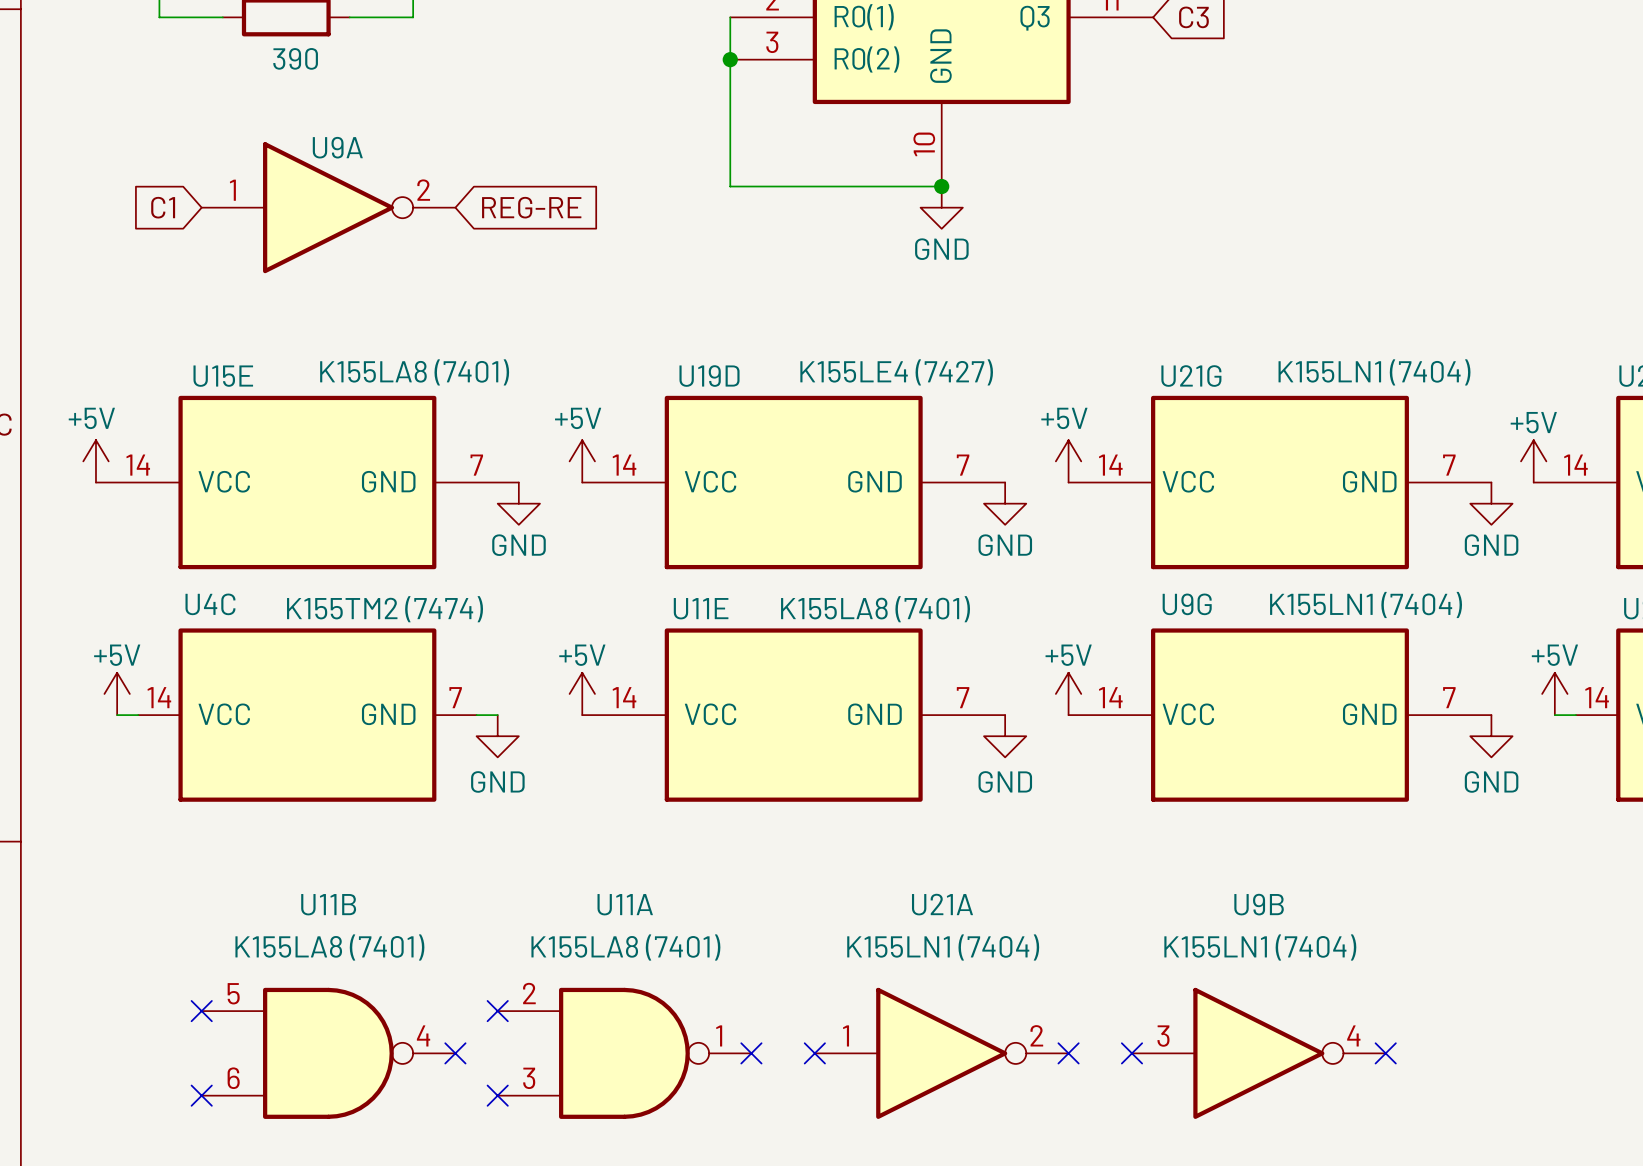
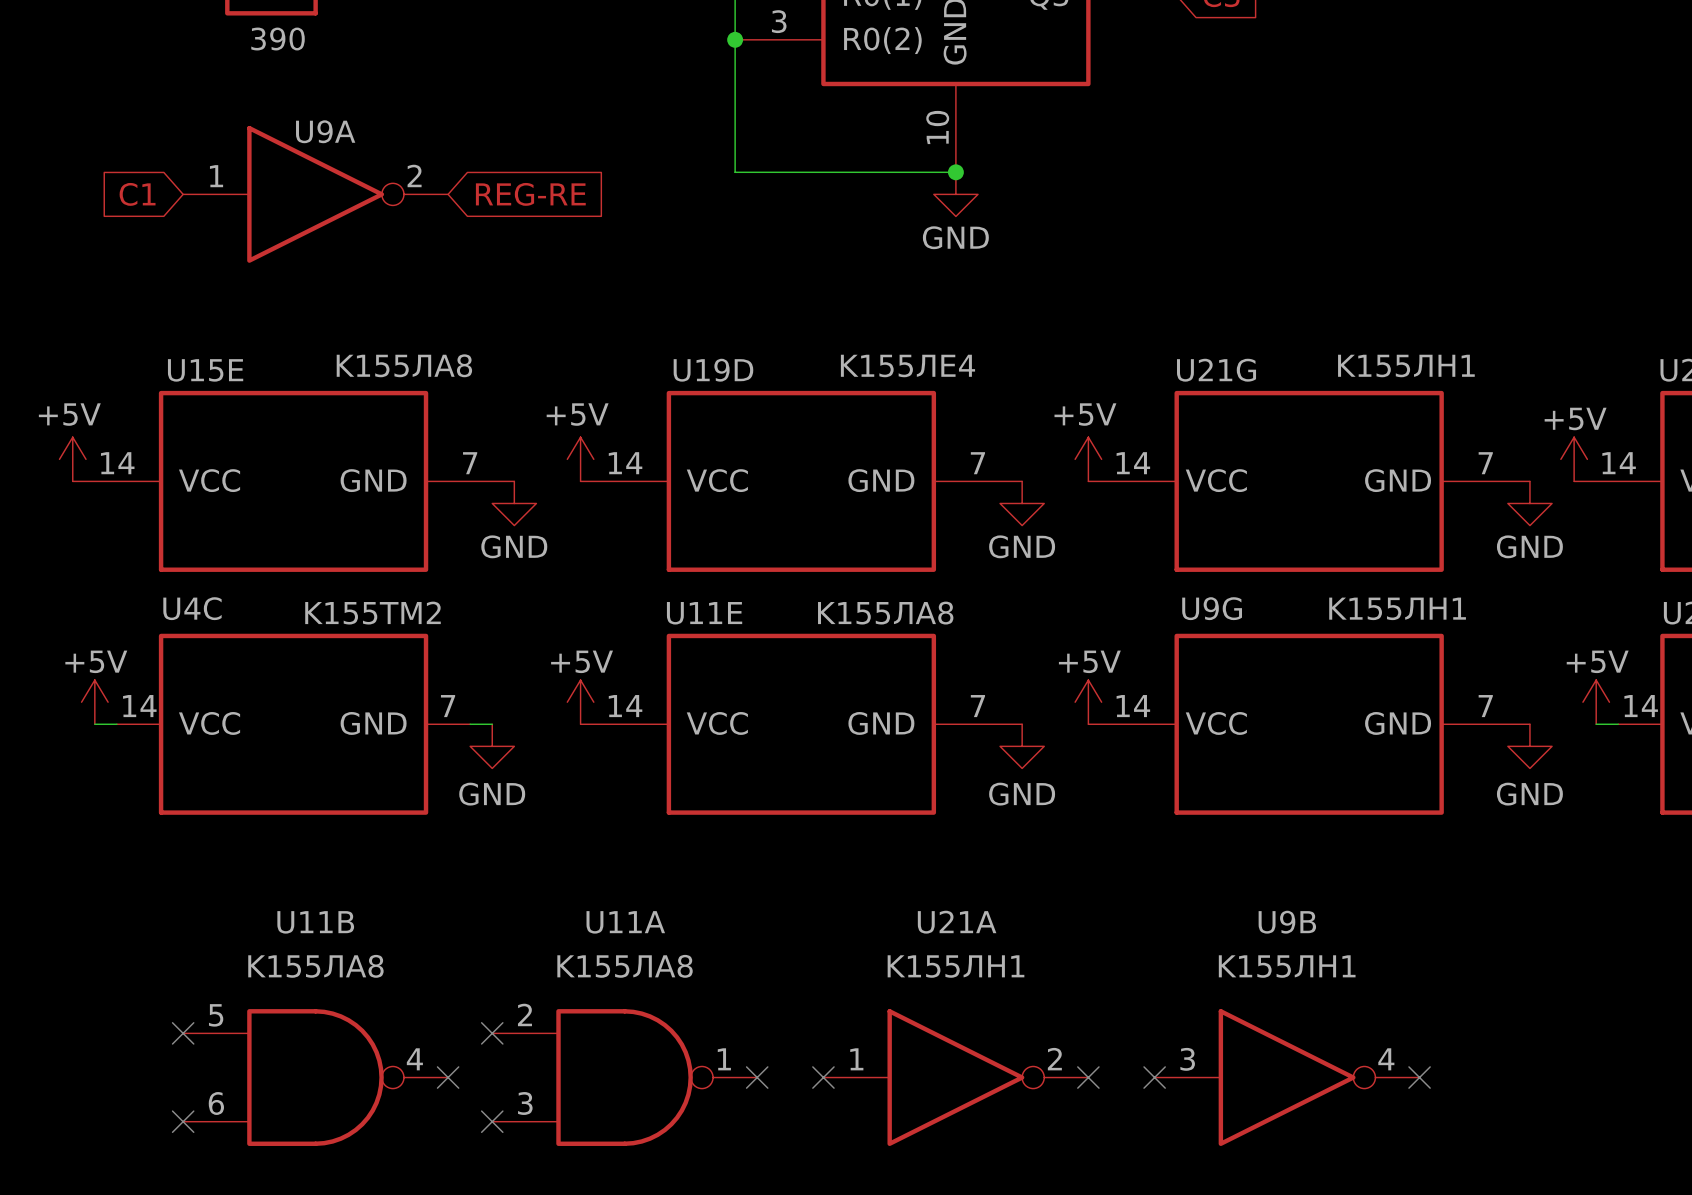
U15E value: K155LA8 (7401) (414, 372) -> K155ЛА8 (404, 365)
U19D value: K155LE4 (7427) (896, 372) -> K155ЛЕ4 (907, 365)
U21G value: K155LN1 (7404) (1374, 372) -> K155ЛН1 (1406, 365)
U9G value: K155LN1 (7404) (1366, 604) -> K155ЛН1 (1397, 608)
U4C value: K155TM2 (7474) (385, 609) -> K155ТМ2 (373, 613)
U11E value: K155LA8 (7401) (875, 609) -> K155ЛА8 (885, 613)
U11B value: K155LA8 (7401) (329, 947) -> K155ЛА8 (315, 966)
U11A value: K155LA8 (7401) (625, 947) -> K155ЛА8 (625, 966)
U21A value: K155LN1 (7404) (943, 947) -> K155ЛН1 (956, 966)
U9B value: K155LN1 (7404) (1260, 947) -> K155ЛН1 (1287, 966)

